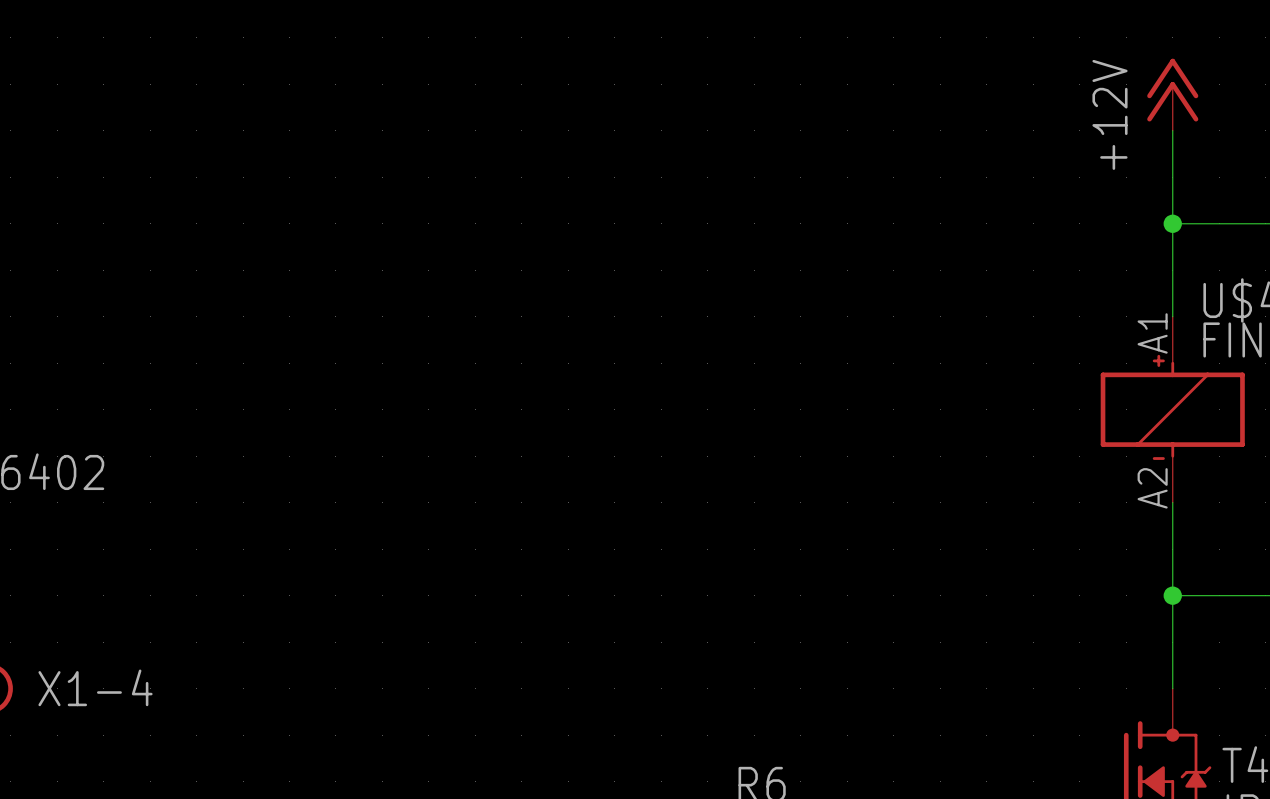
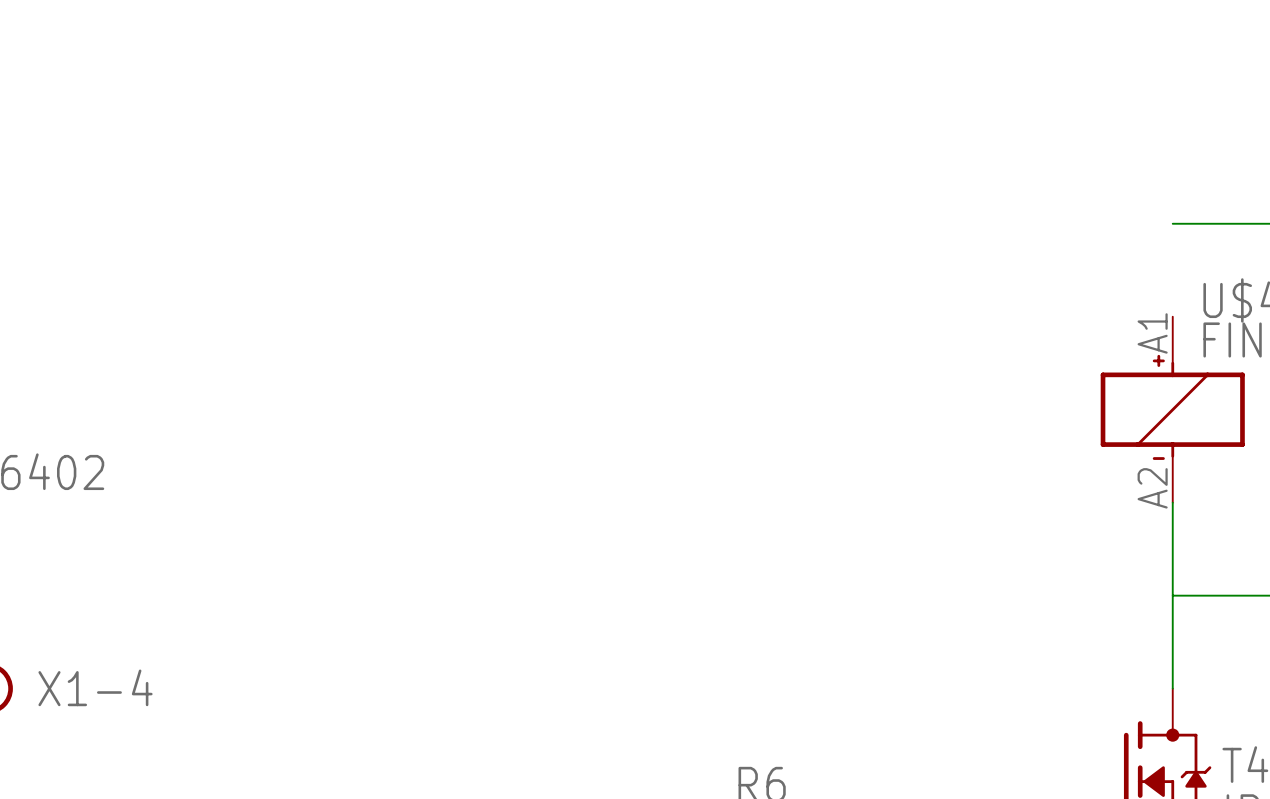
power symbol: +12V (1172, 94) -> none
wire: (1172, 130) (1172, 316) -> none
junction: (1172, 223) -> none
junction: (1172, 595) -> none

